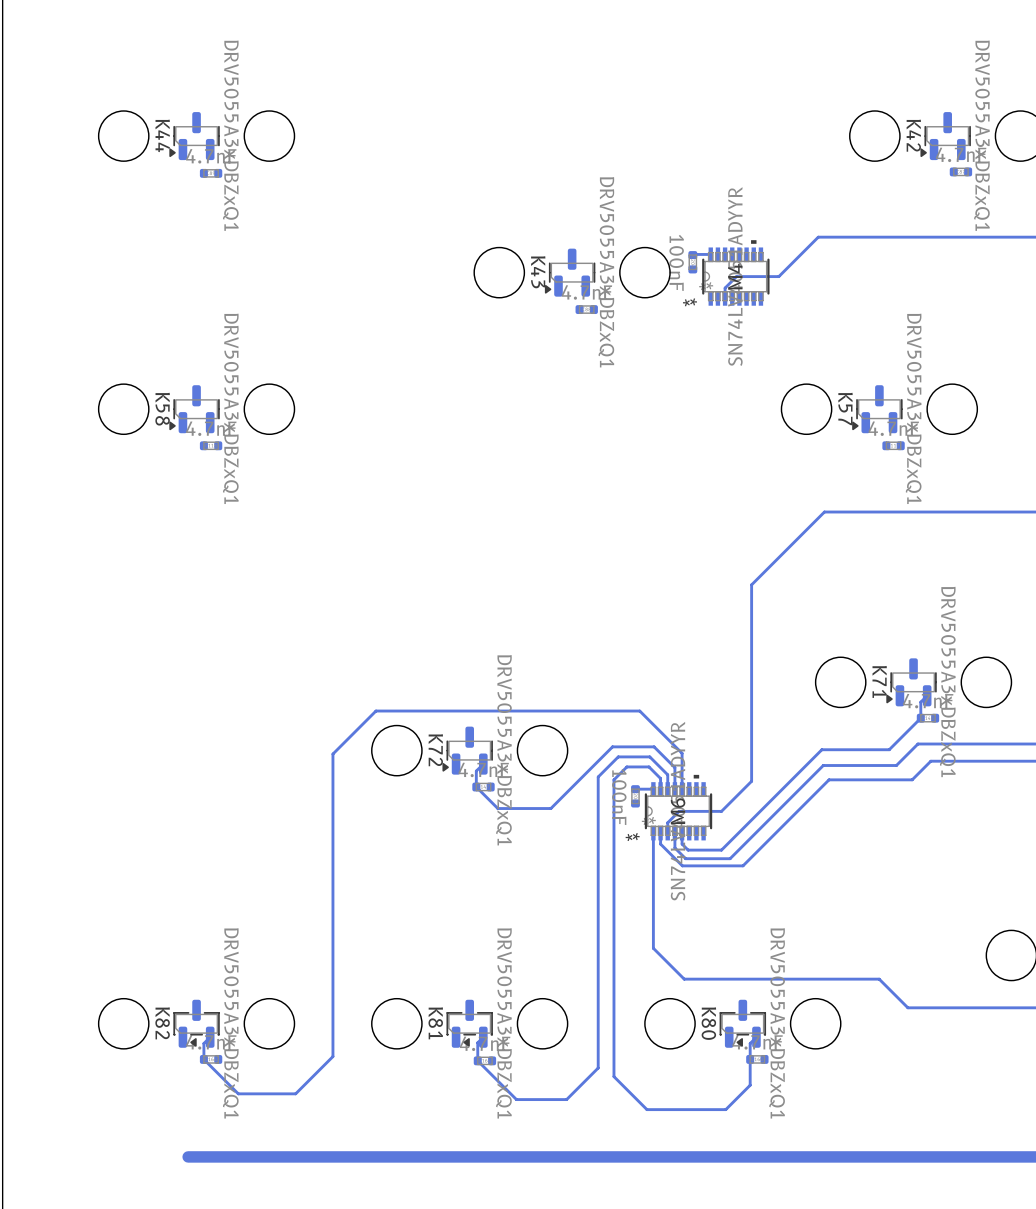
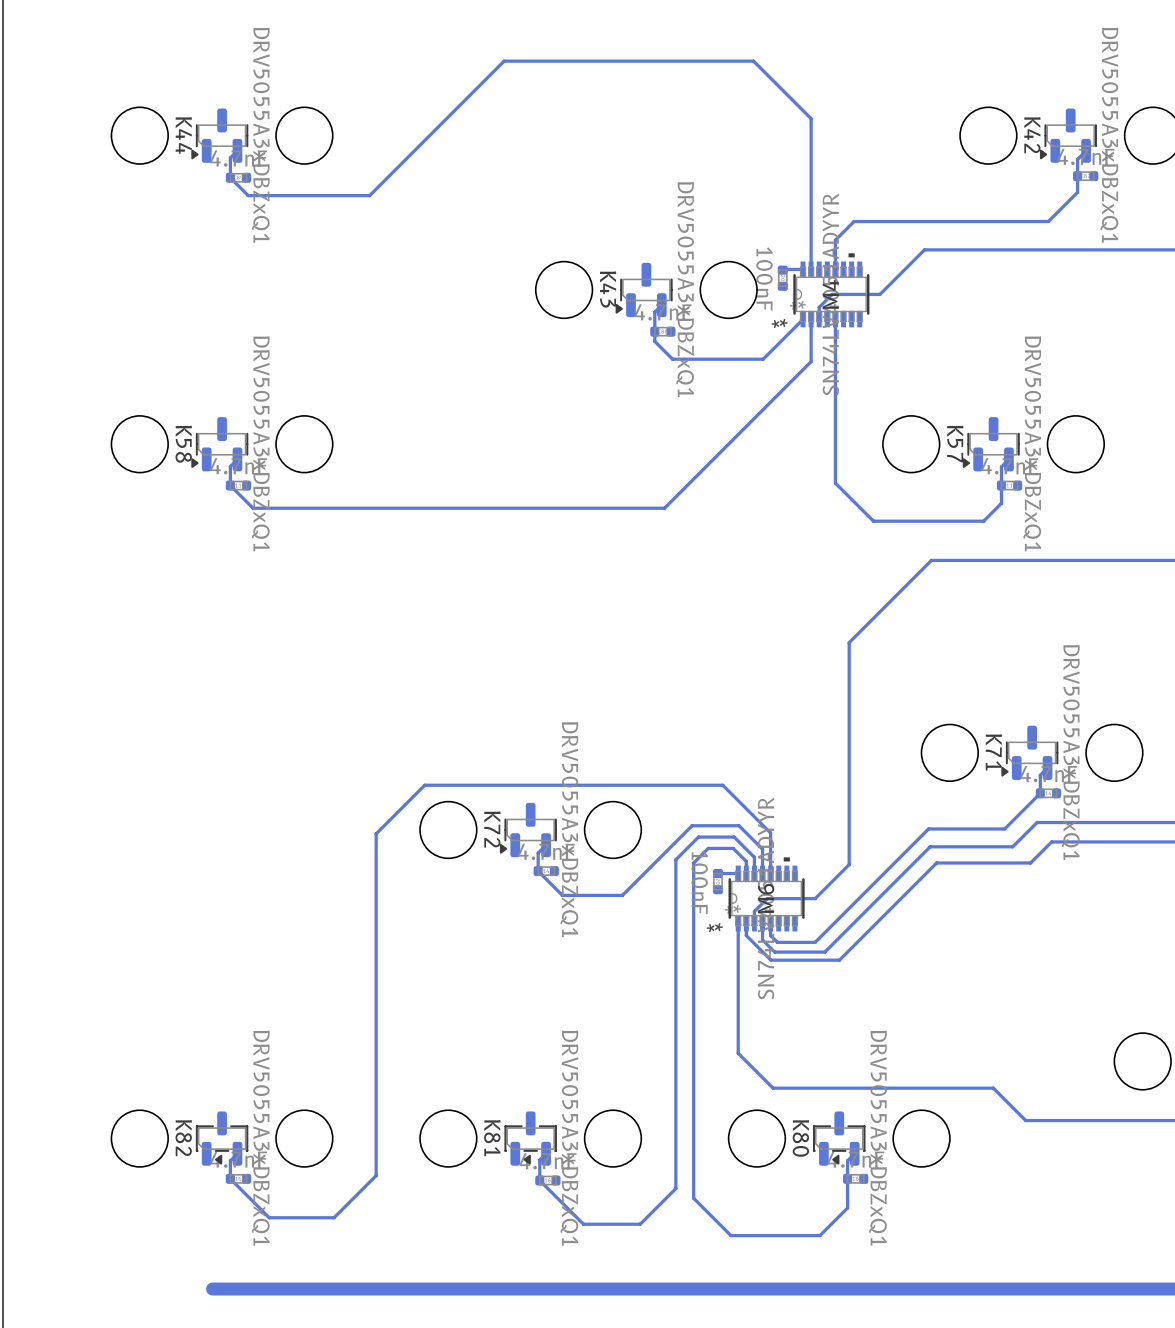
bottom track: none -> (237, 150) (230, 157) (230, 177) (248, 195) (369, 195) (504, 61) (753, 61) (811, 118) (811, 269)
bottom track: none -> (1086, 150) (1077, 159) (1077, 192) (1048, 221) (854, 221) (835, 240) (835, 269)
bottom track: none -> (661, 305) (654, 312) (654, 341) (672, 359) (763, 359) (803, 319)
bottom track: none -> (811, 319) (811, 361) (664, 508) (253, 508) (230, 485) (230, 466) (237, 459)
bottom track: none -> (835, 319) (835, 483) (873, 521) (983, 521) (1001, 503) (1001, 466) (1008, 459)

